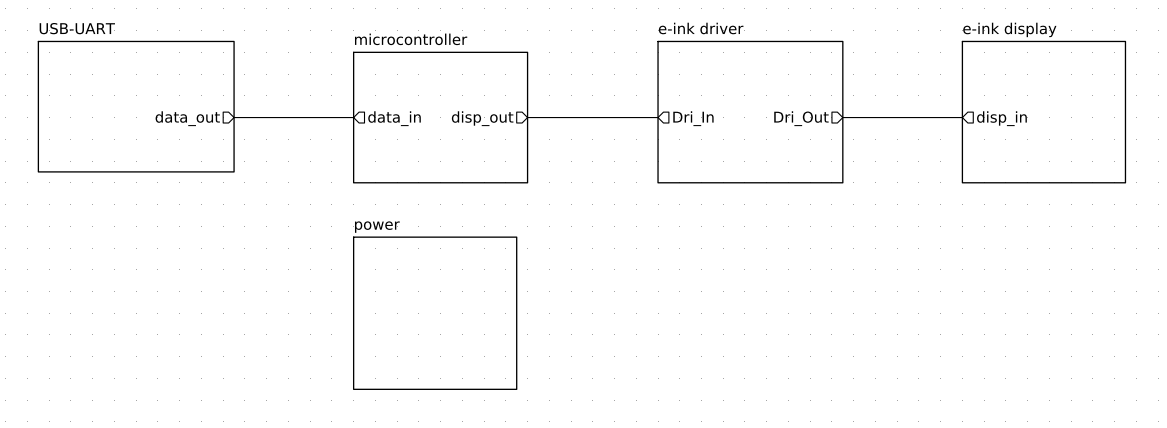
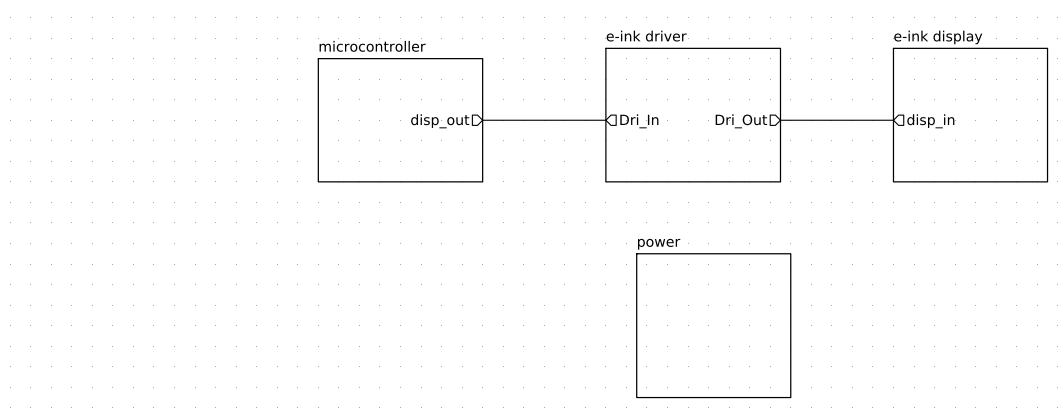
sheet USB-UART: (136, 106) -> none
wire: (234, 117) (353, 117) -> none
hierarchical label: data_out (187, 118) -> none
hierarchical label: data_in (394, 118) -> none
sheet power: (435, 313) -> none
sheet power: none -> (713, 325)

